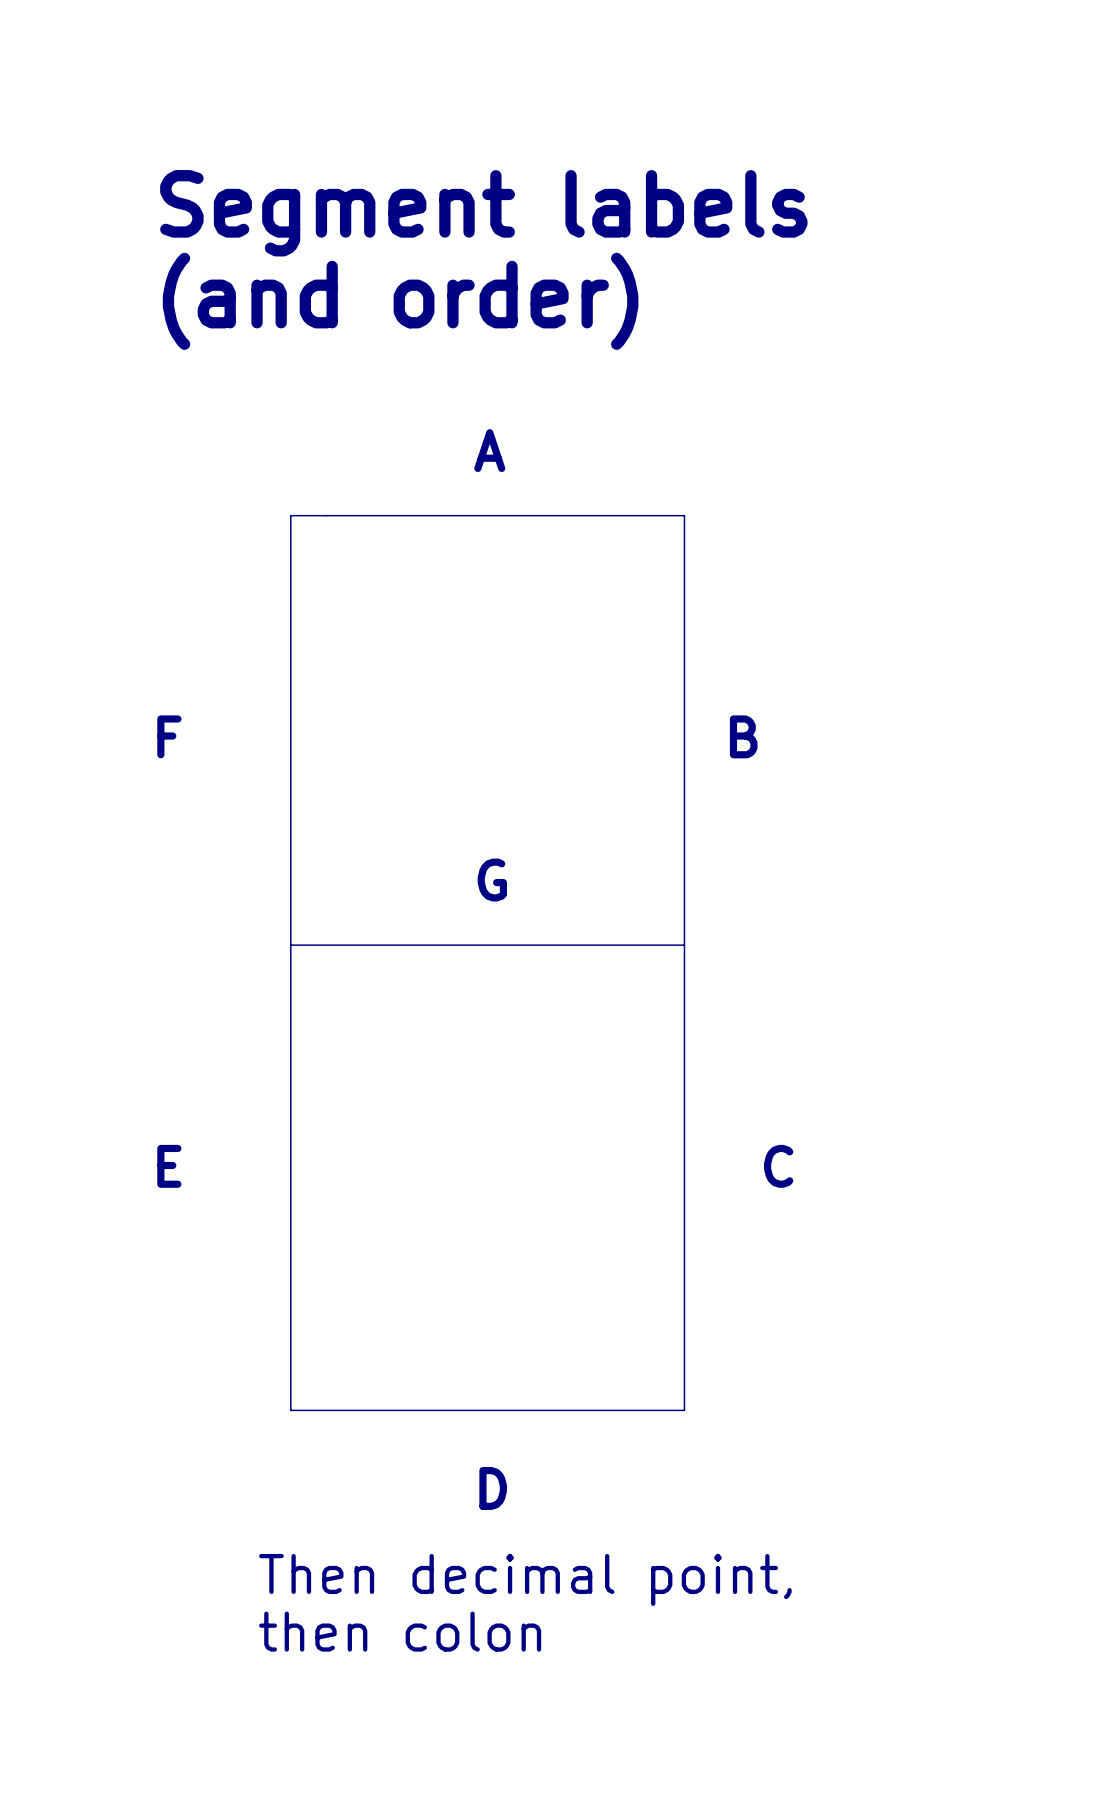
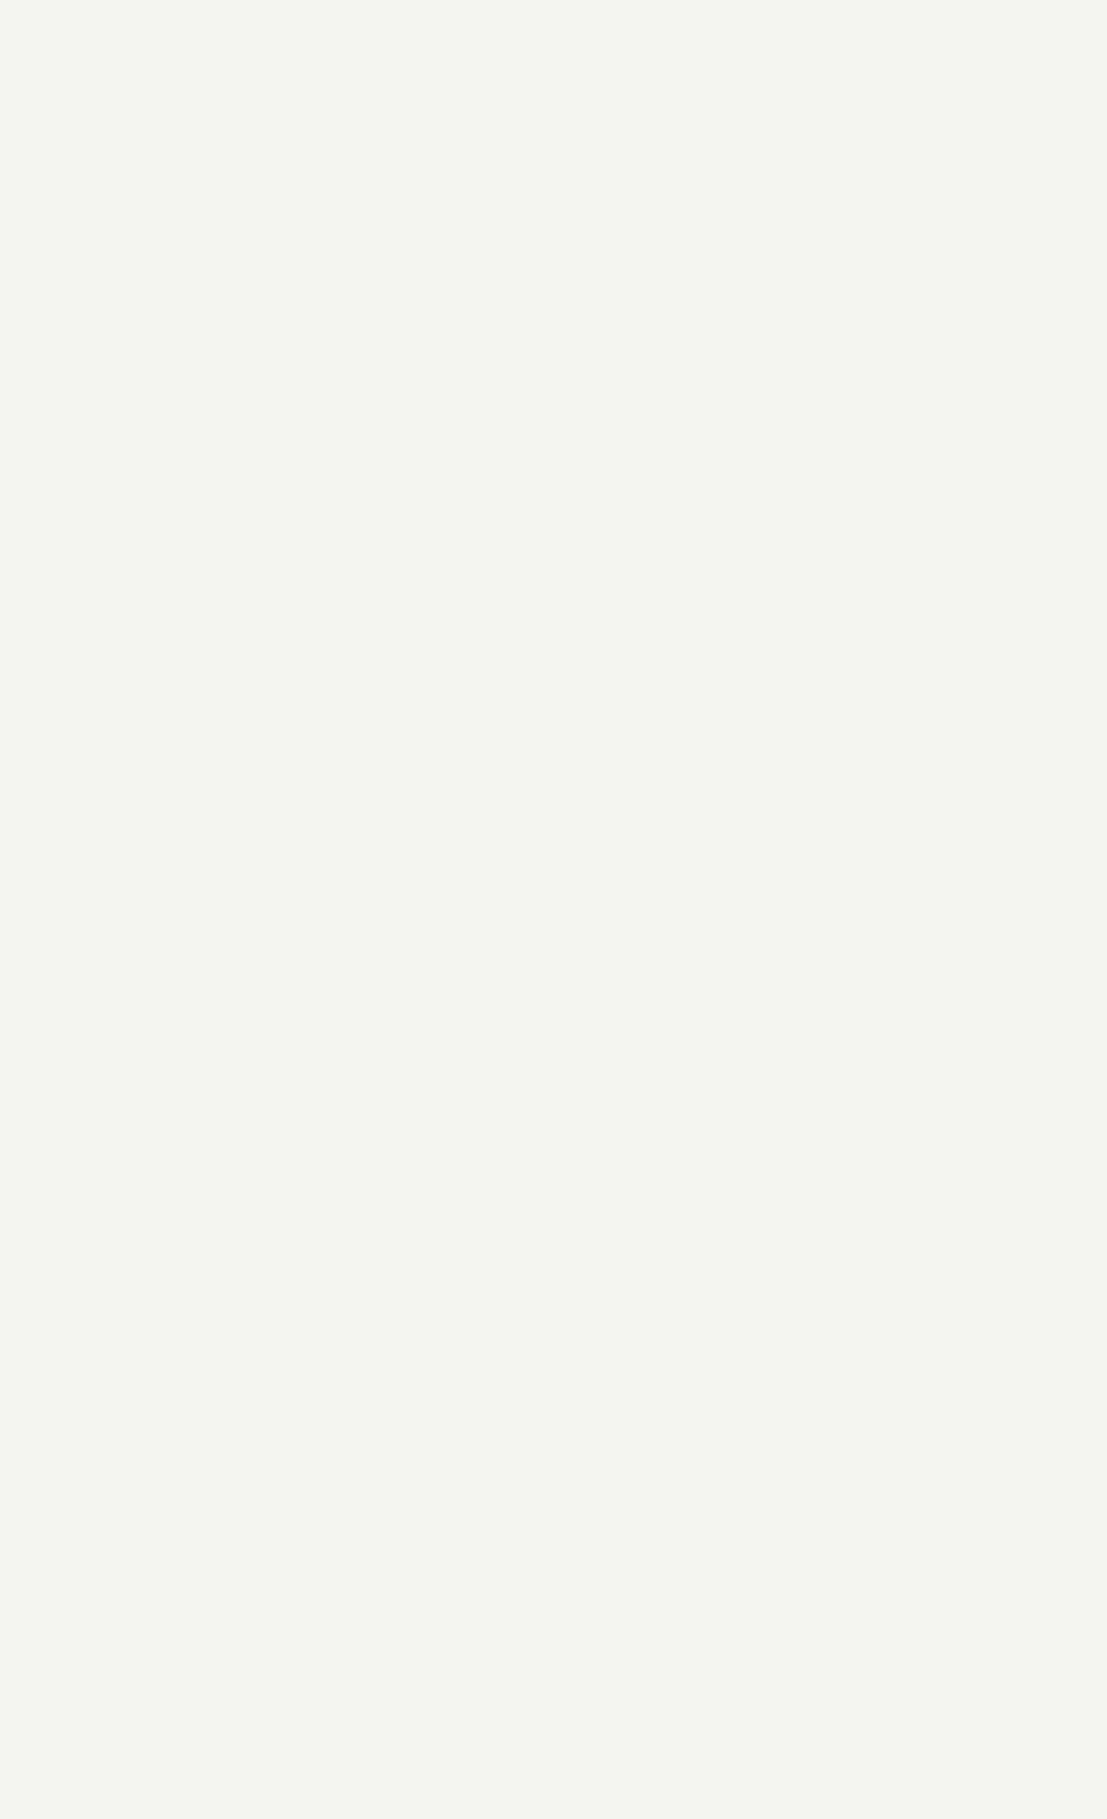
text: Segment labels (483, 213) -> none
text: (and order) (400, 301) -> none
text: A (489, 450) -> none
line: (290, 515) (684, 515) (684, 1410) (290, 1410) (290, 515) -> none
text: F (169, 736) -> none
text: B (743, 736) -> none
text: G (492, 880) -> none
line: (290, 945) (684, 945) -> none
text: E (169, 1166) -> none
text: C (778, 1166) -> none
text: D (493, 1488) -> none
text: Then decimal point, (525, 1579) -> none
text: then colon (400, 1631) -> none

